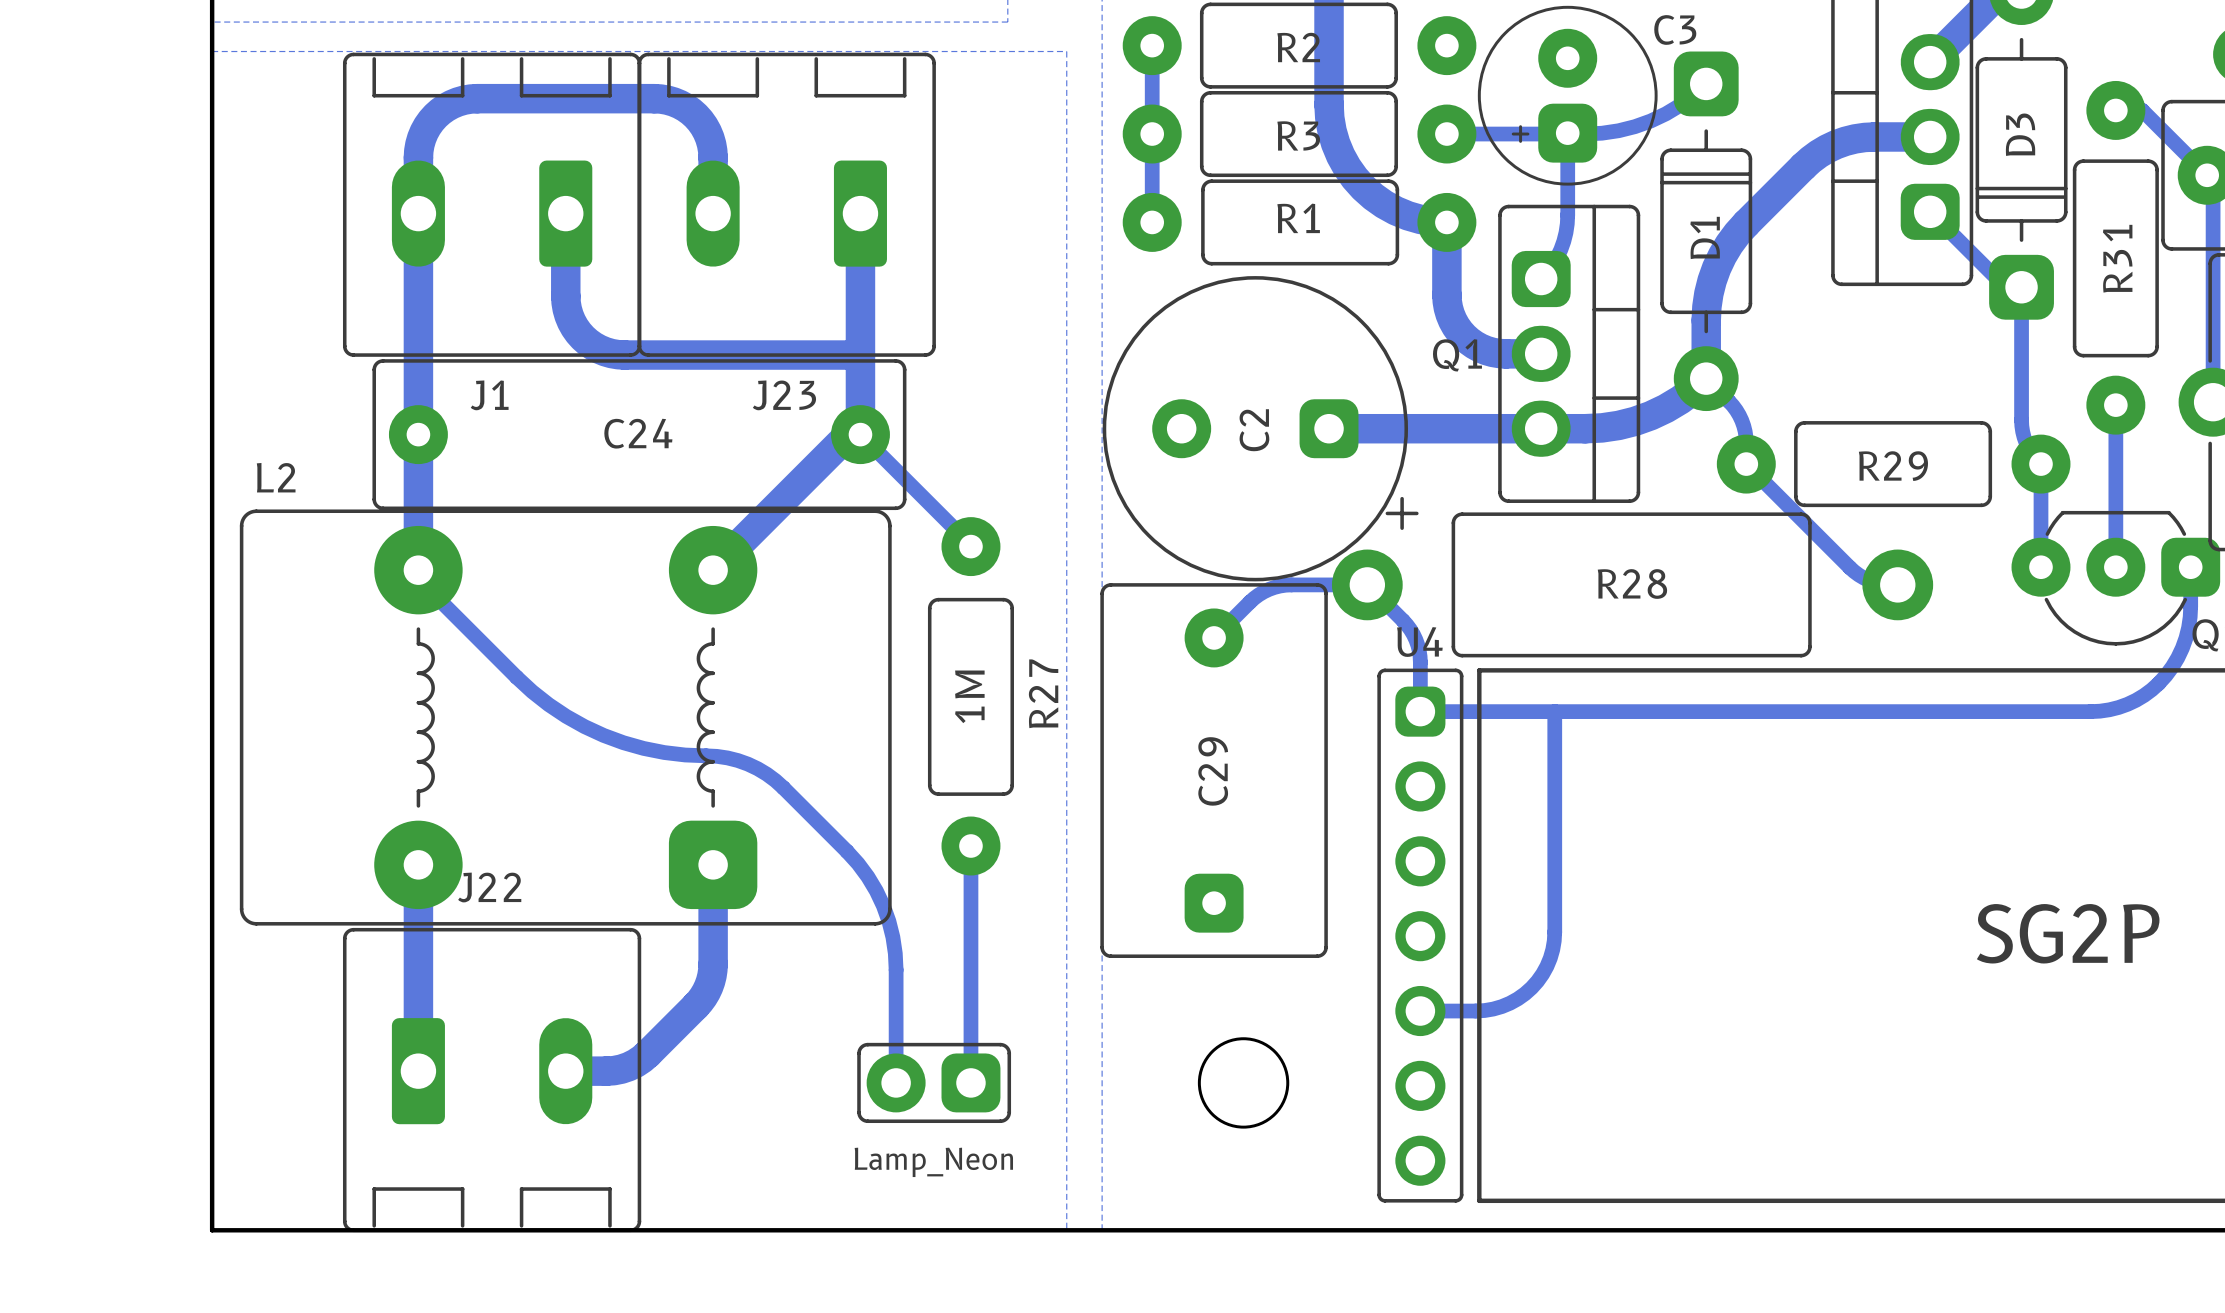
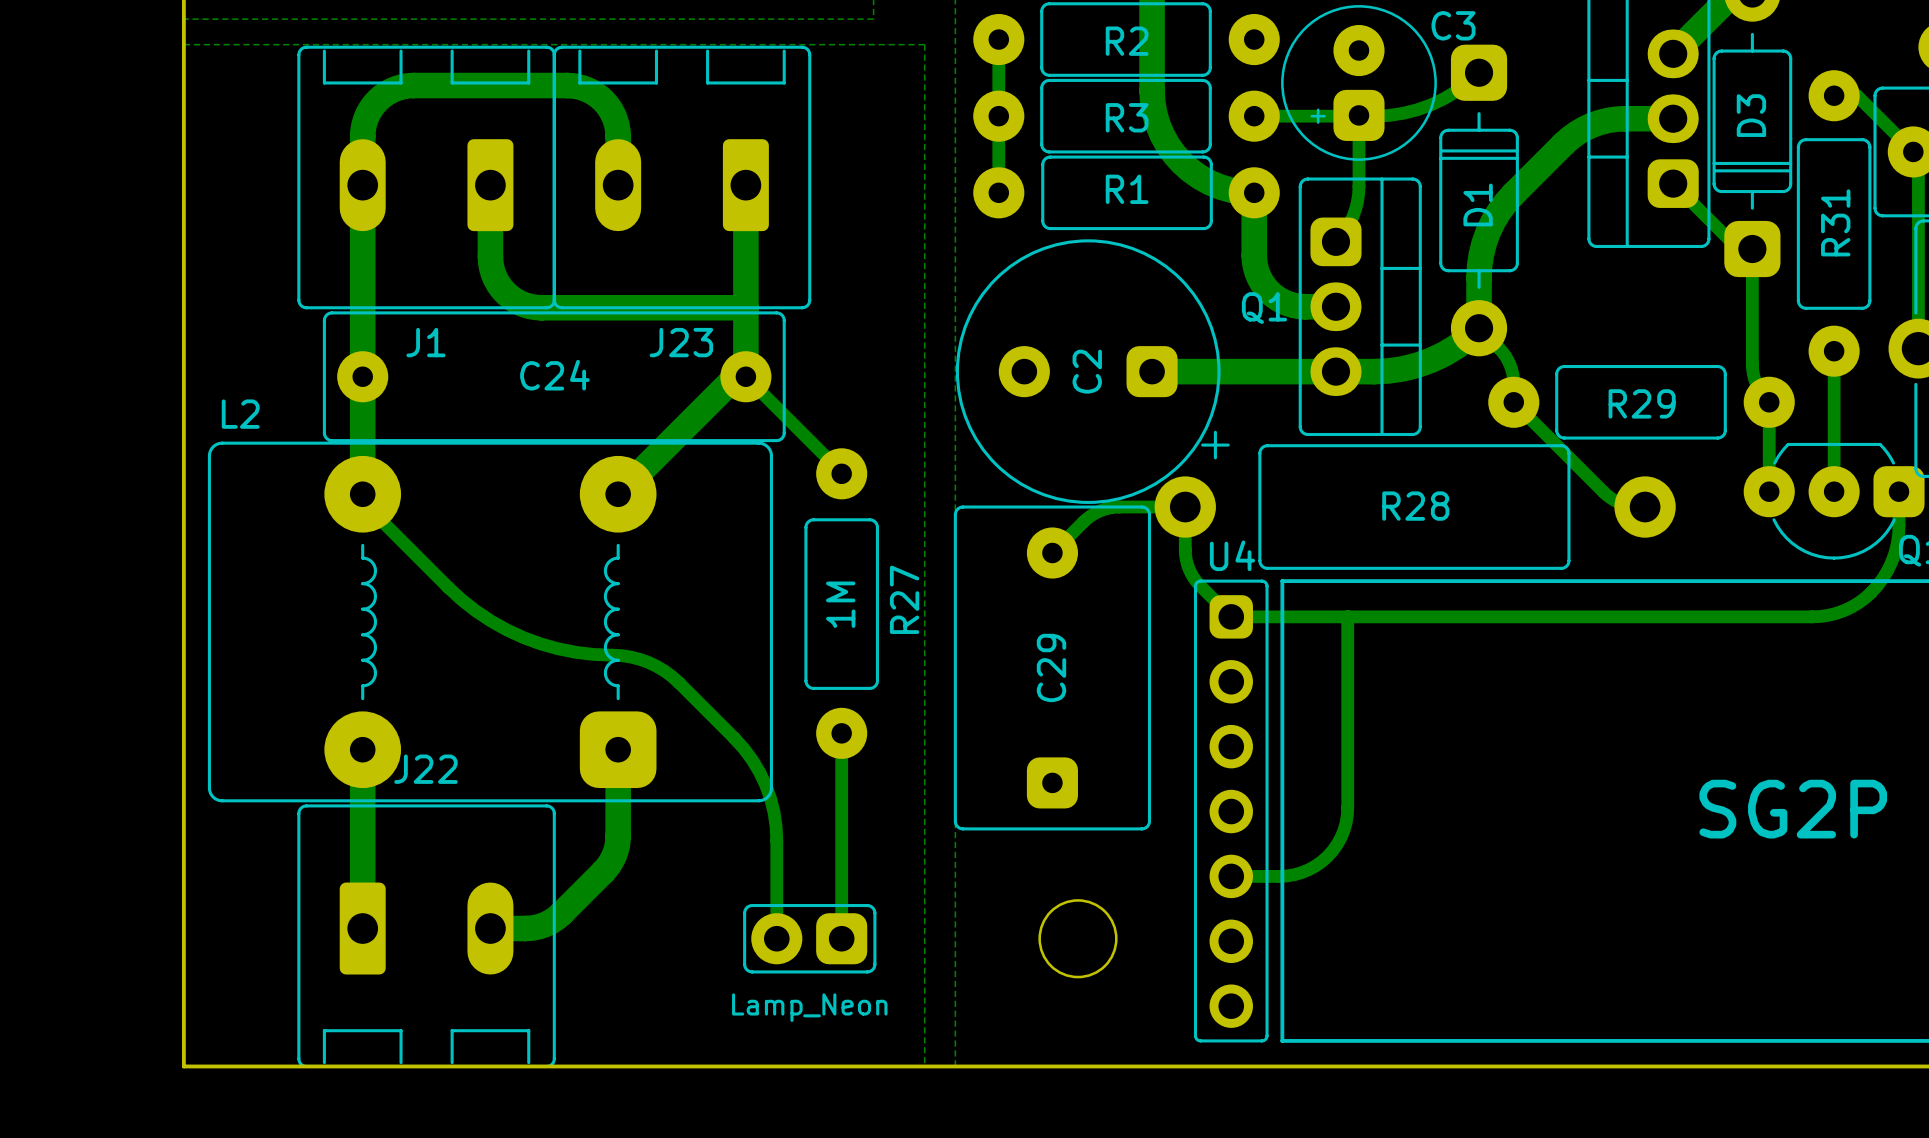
bottom track: (1367, 584) (1407, 624) (1415, 639) (1420, 656) (1420, 711) -> (1185, 507) (1185, 554) (1189, 569) (1196, 582) (1231, 616)

